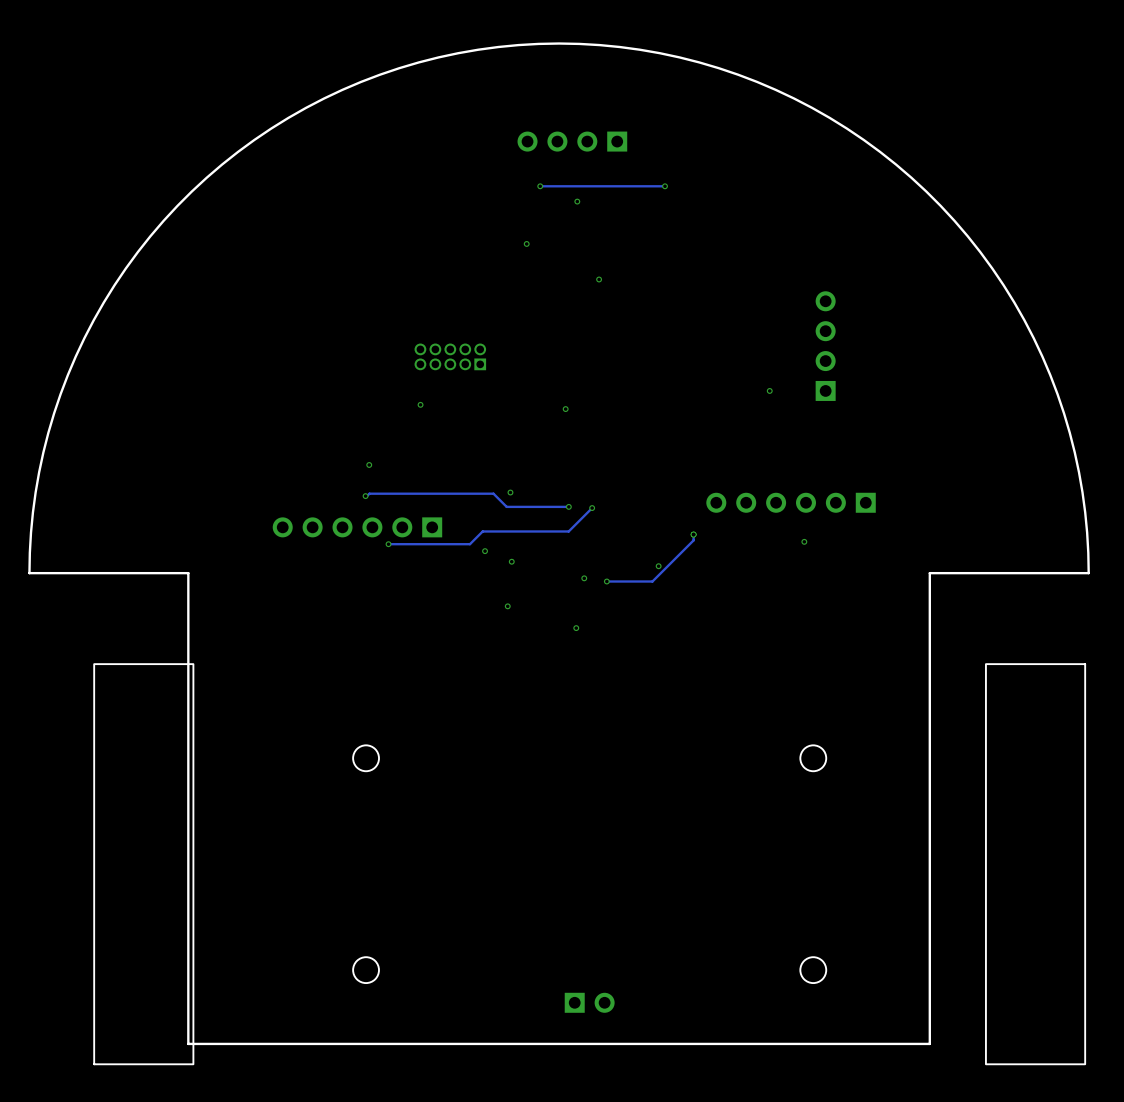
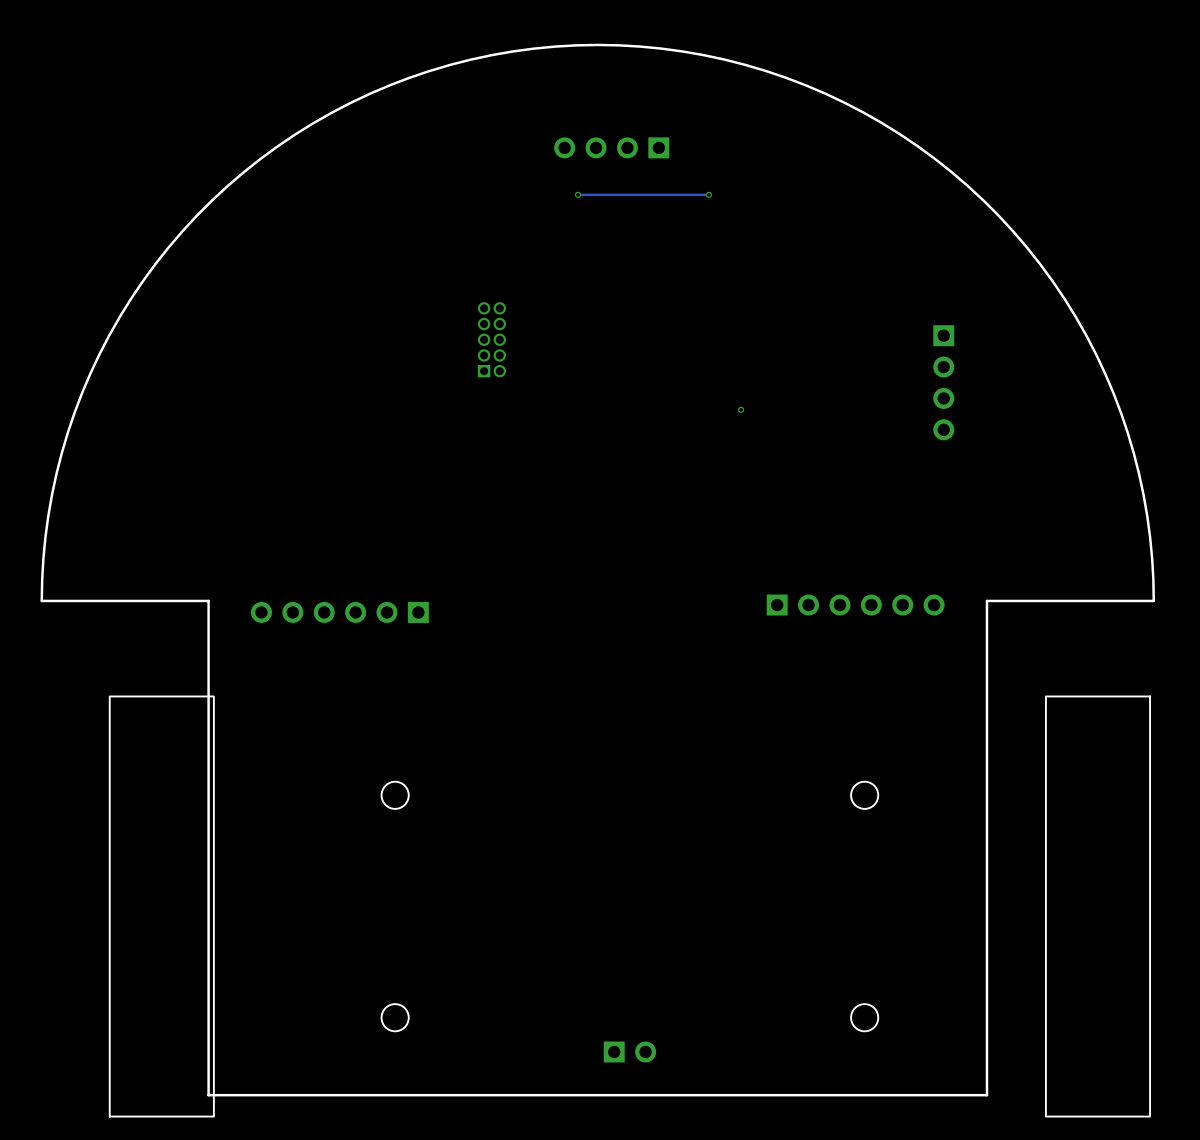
via: (577, 201) -> none
via: (526, 243) -> none
via: (599, 279) -> none
part rotation: 0° (825, 346) -> 180° (943, 382)
part position: (825, 346) -> (943, 382)
part rotation: 0° (450, 356) -> 90° clockwise (491, 339)
via: (769, 390) -> none
via: none -> (741, 409)
via: (420, 404) -> none
via: (565, 409) -> none
via: (369, 464) -> none
via: (510, 492) -> none
track: (365, 496) (369, 493) (493, 493) (506, 506) (568, 506) -> none
via: (365, 496) -> none
part rotation: 0° (791, 502) -> 180° (855, 605)
via: (568, 506) -> none
track: (592, 508) (568, 531) (482, 531) (469, 544) (388, 544) -> none
via: (592, 508) -> none
part position: (357, 527) -> (339, 612)
track: (693, 534) (693, 540) (652, 581) (606, 581) -> none
via: (693, 534) -> none
via: (804, 541) -> none
via: (388, 544) -> none
via: (485, 551) -> none
via: (511, 561) -> none
via: (658, 566) -> none
via: (584, 578) -> none
via: (606, 581) -> none
via: (507, 606) -> none
via: (576, 628) -> none

